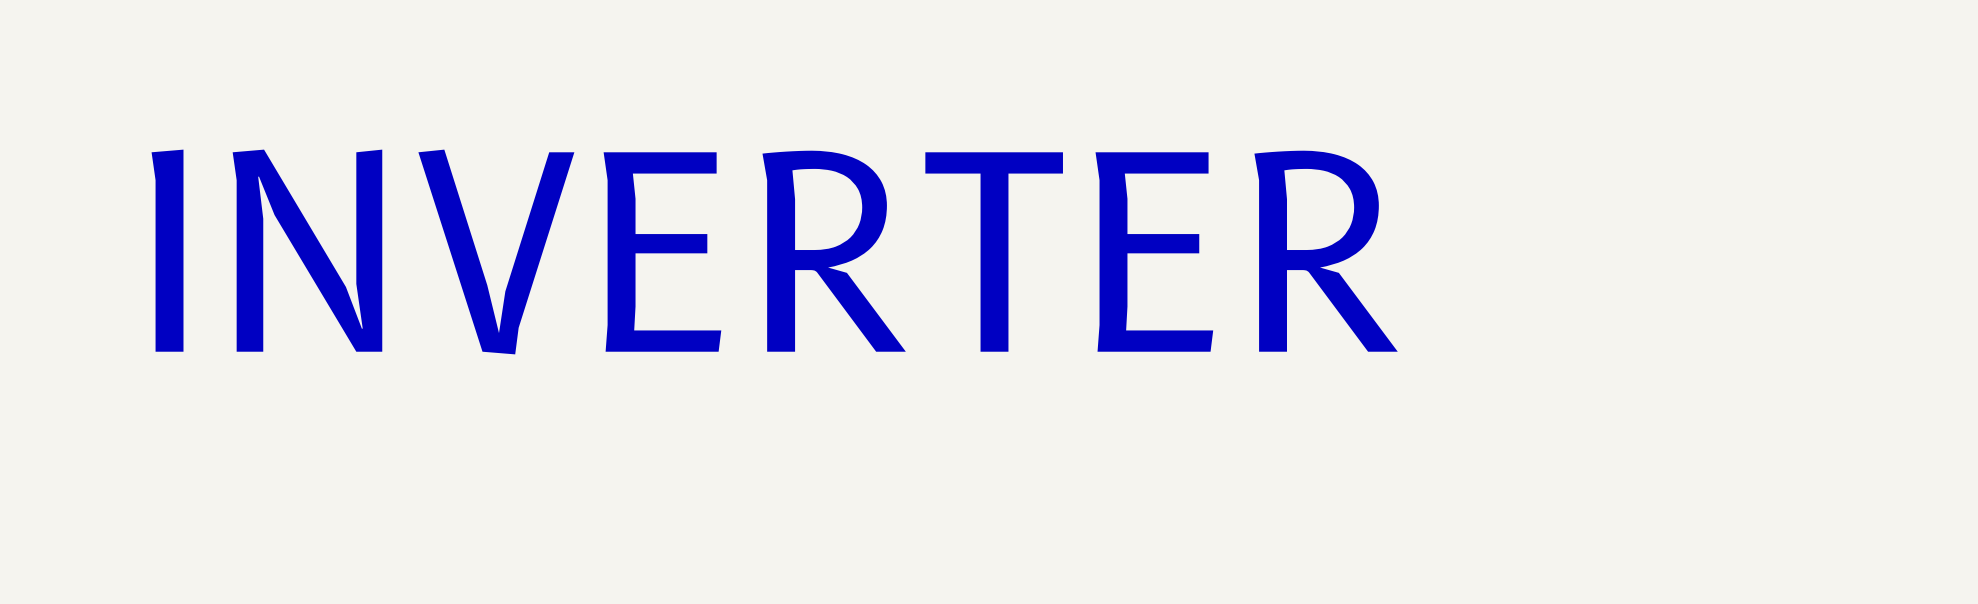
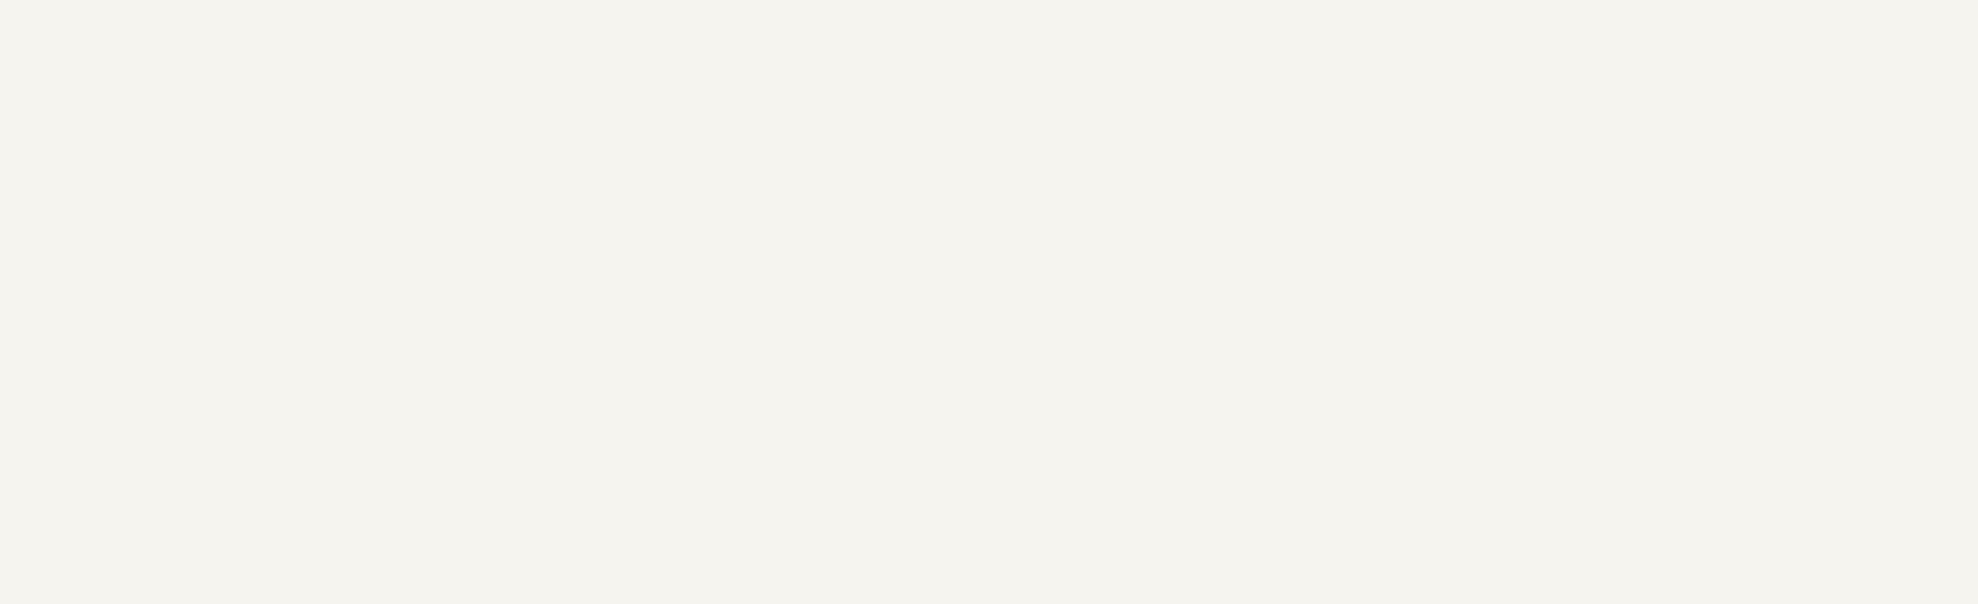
text: INVERTER (774, 252) -> none

